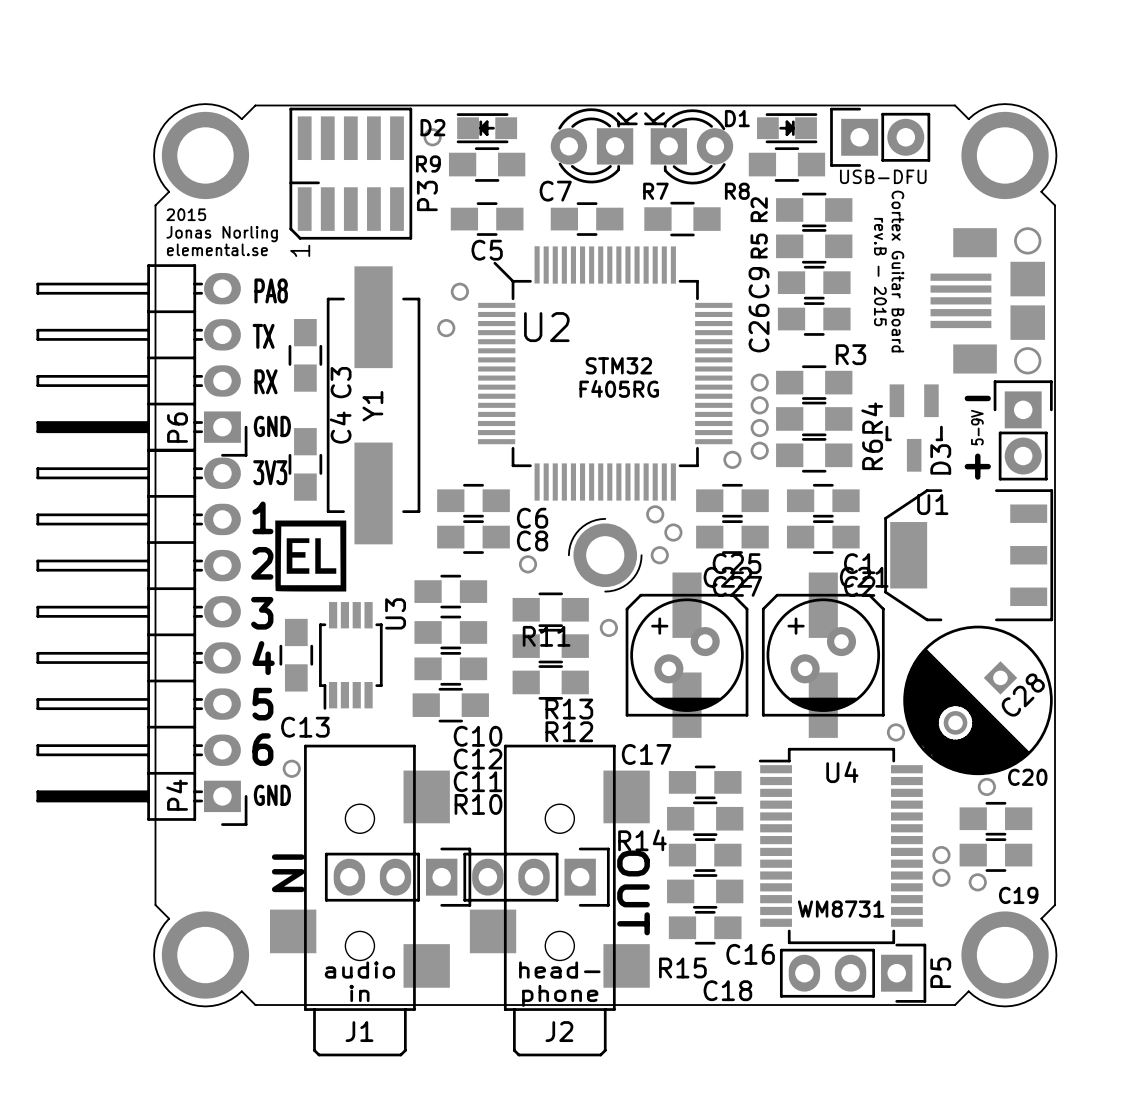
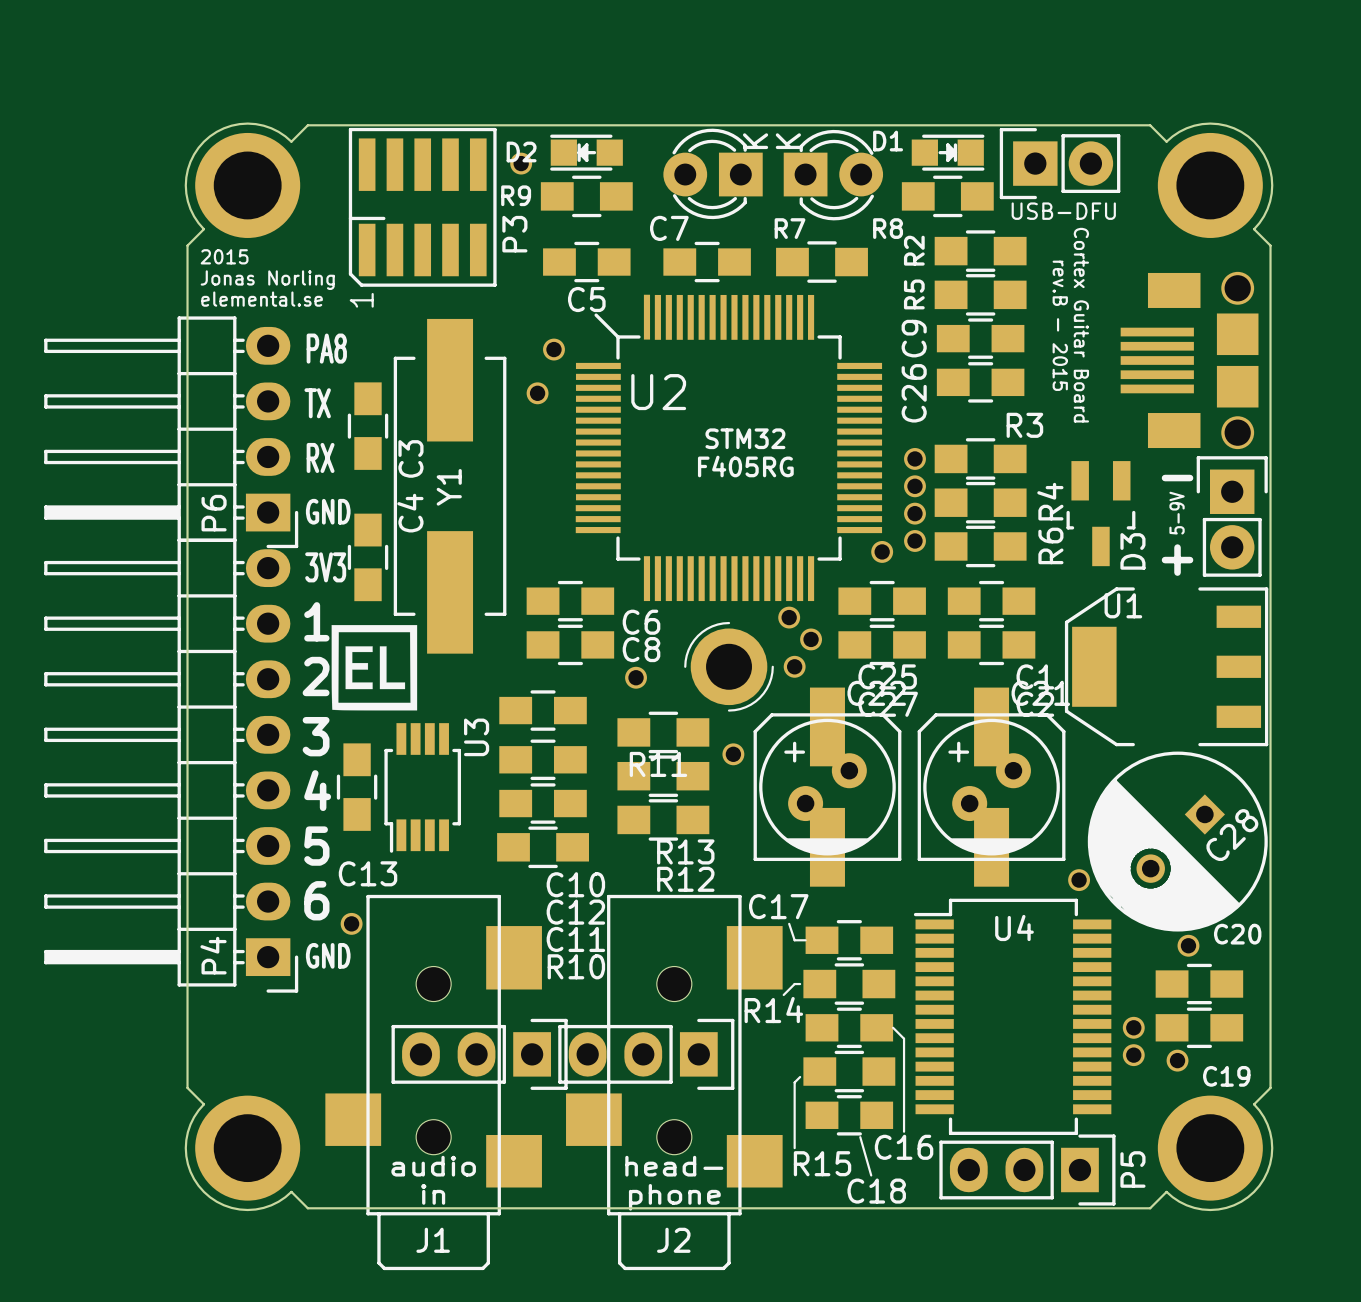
line: none -> (789, 923) (794, 940) (805, 940)
line: none -> (800, 984) (794, 984) (783, 994)
line: none -> (893, 1027) (904, 1038) (904, 1131)
text: IN (288, 873) -> none
text: OUT (633, 892) -> none
line: none -> (800, 1077) (794, 1082) (794, 1148)
text: WM8731 (841, 909) -> none
line: none -> (860, 1137) (871, 1175)

